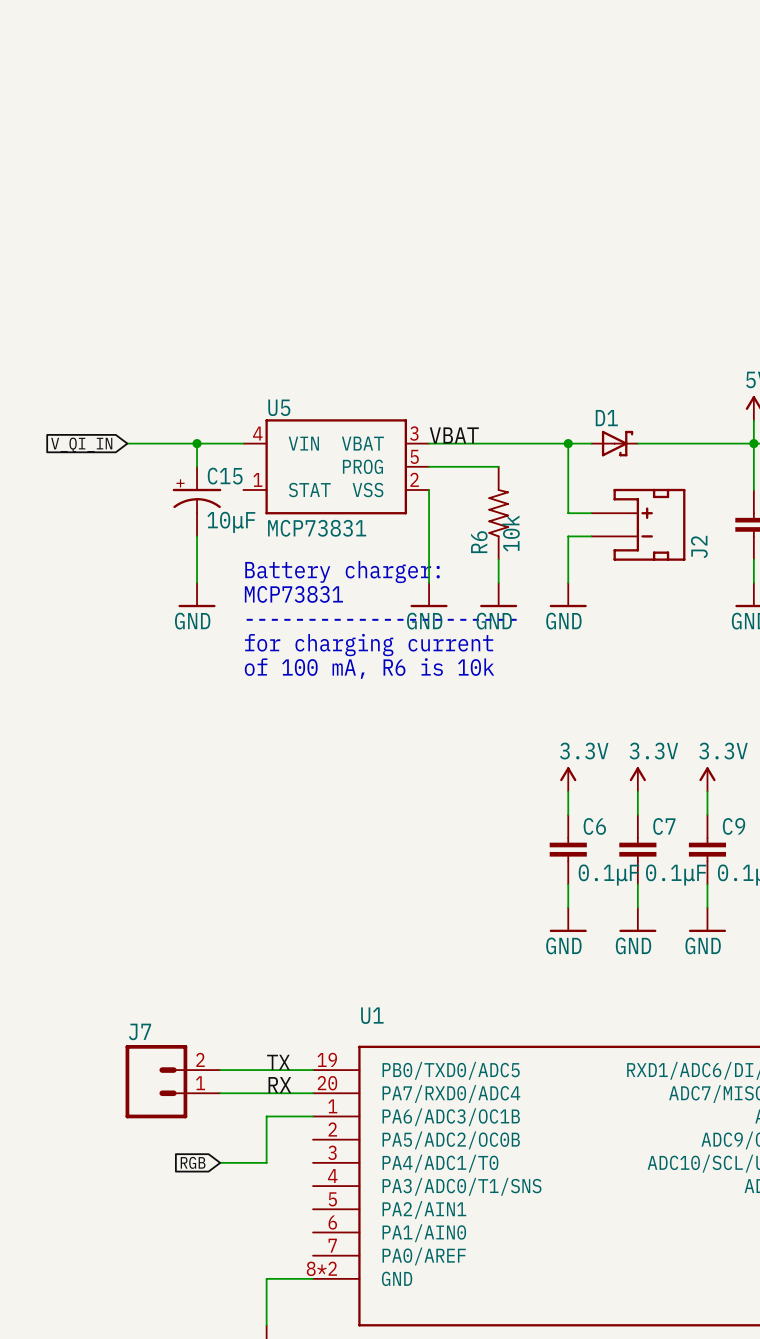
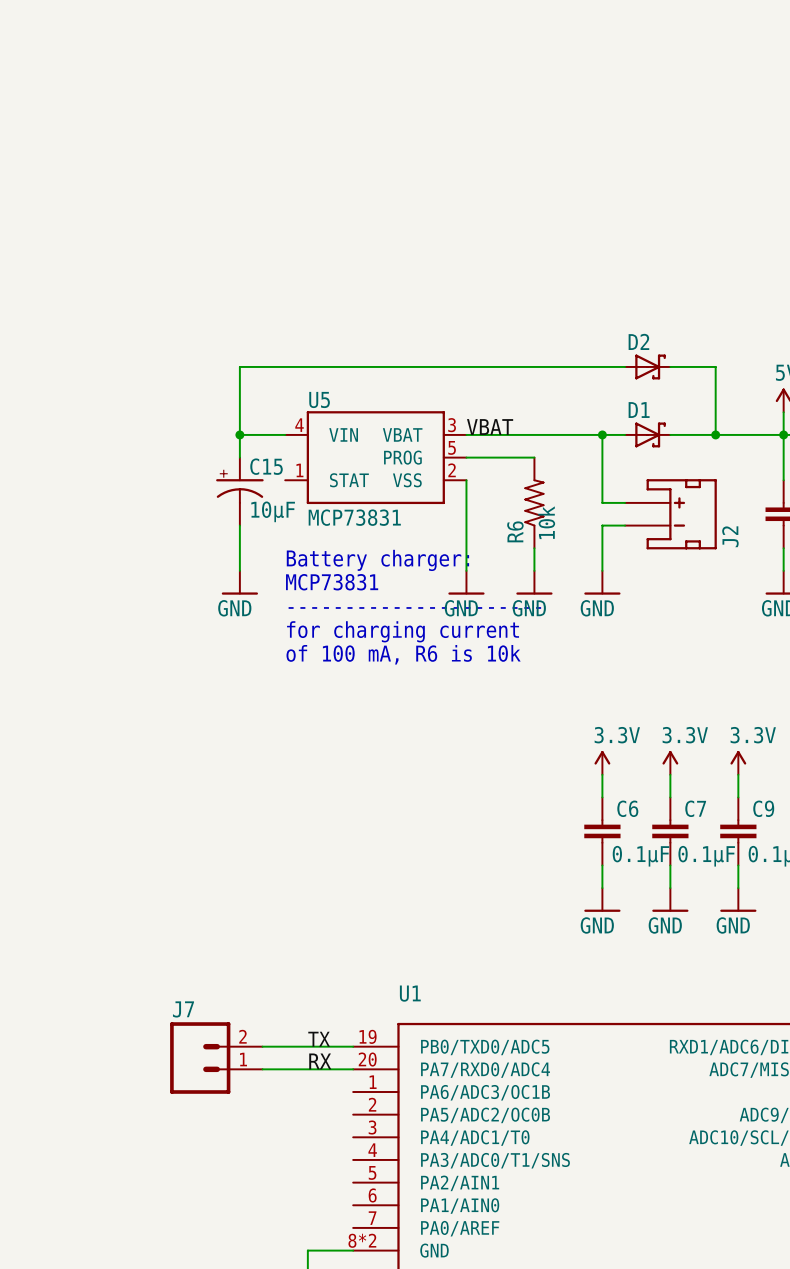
D2: none -> (647, 366)
wire: none -> (670, 366) (715, 366) (715, 434)
wire: (127, 443) (197, 443) -> (625, 366) (239, 366) (239, 434)
junction: none -> (715, 434)
global label: V_QI_IN (81, 444) -> none
wire: (313, 1116) (266, 1116) (266, 1162) (220, 1162) -> none
global label: RGB (193, 1162) -> none

